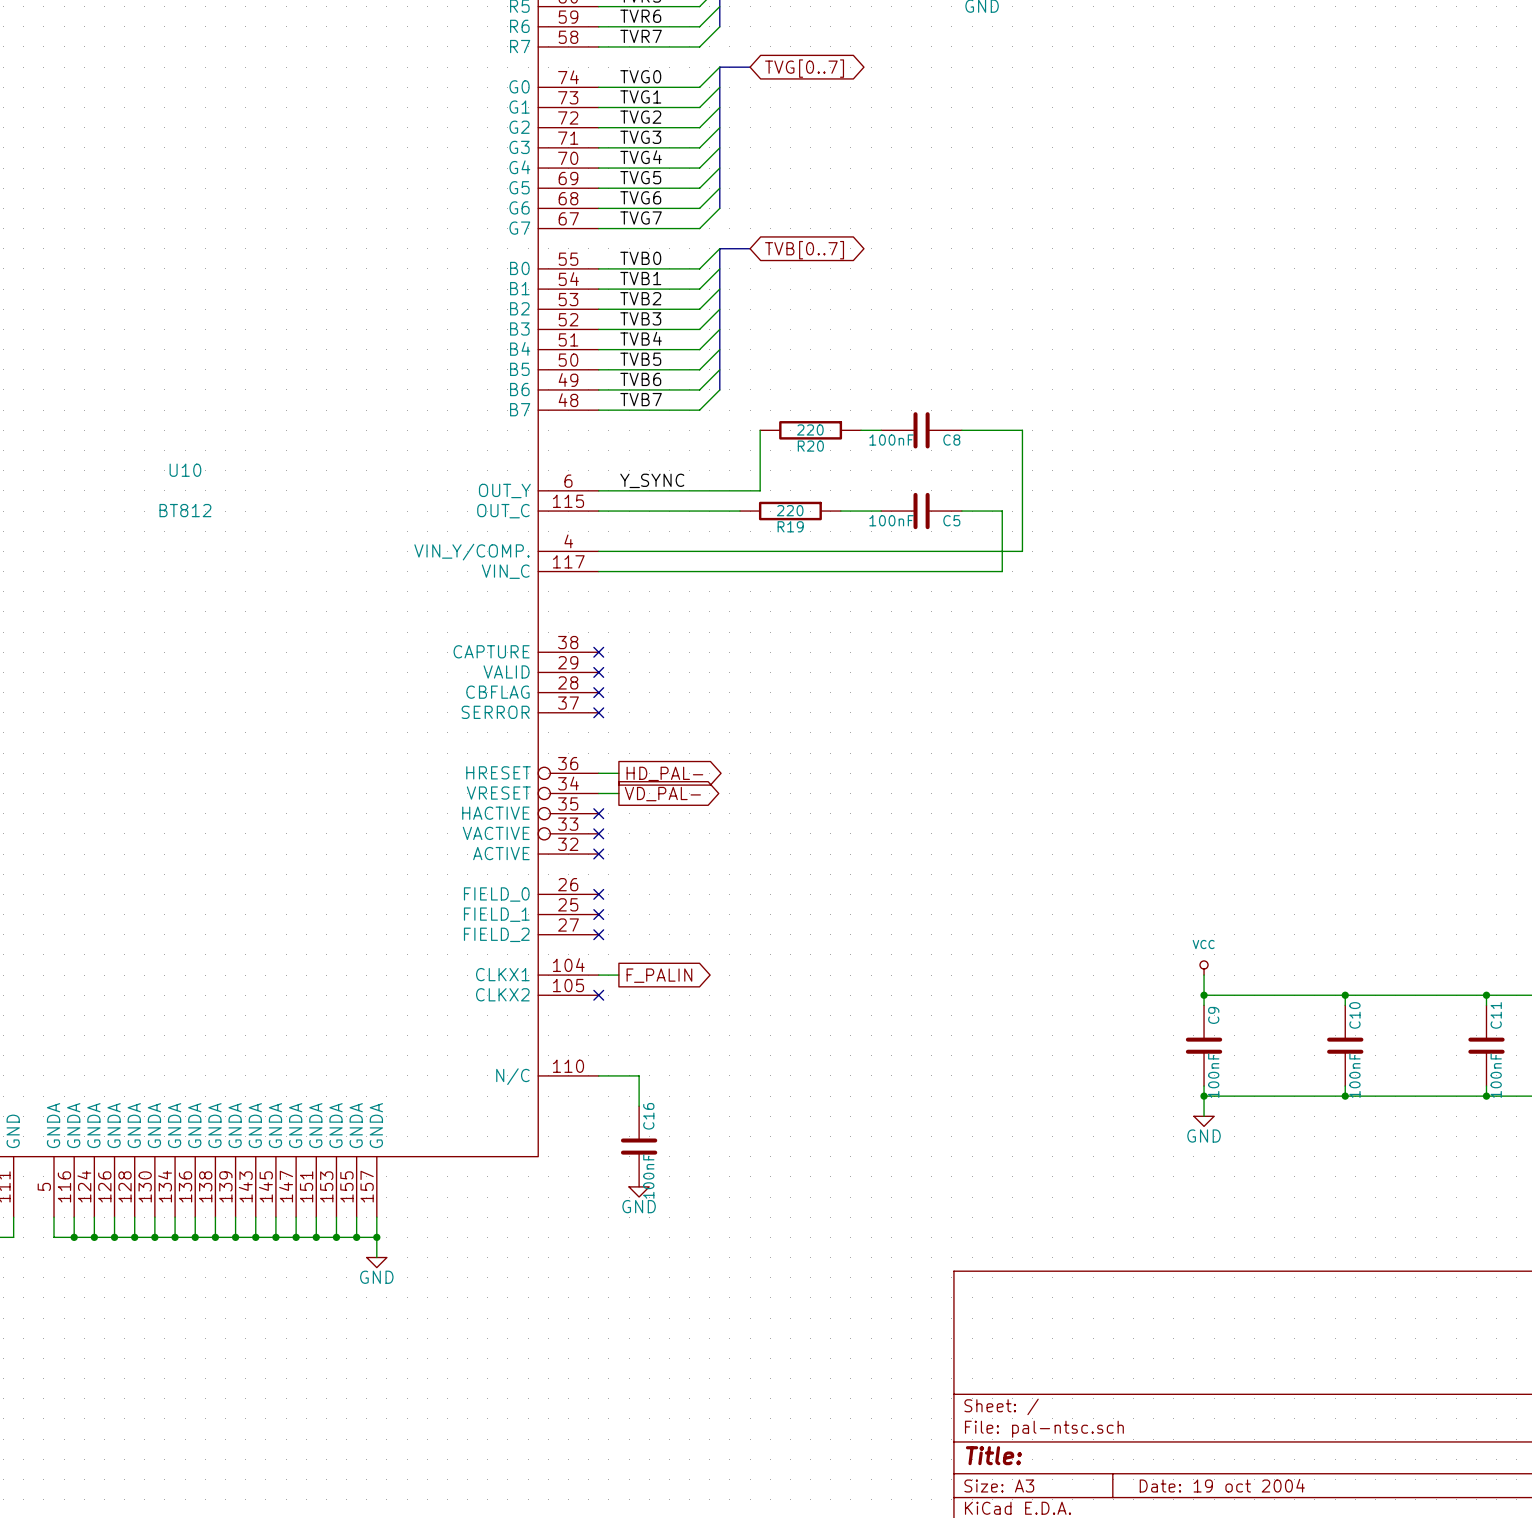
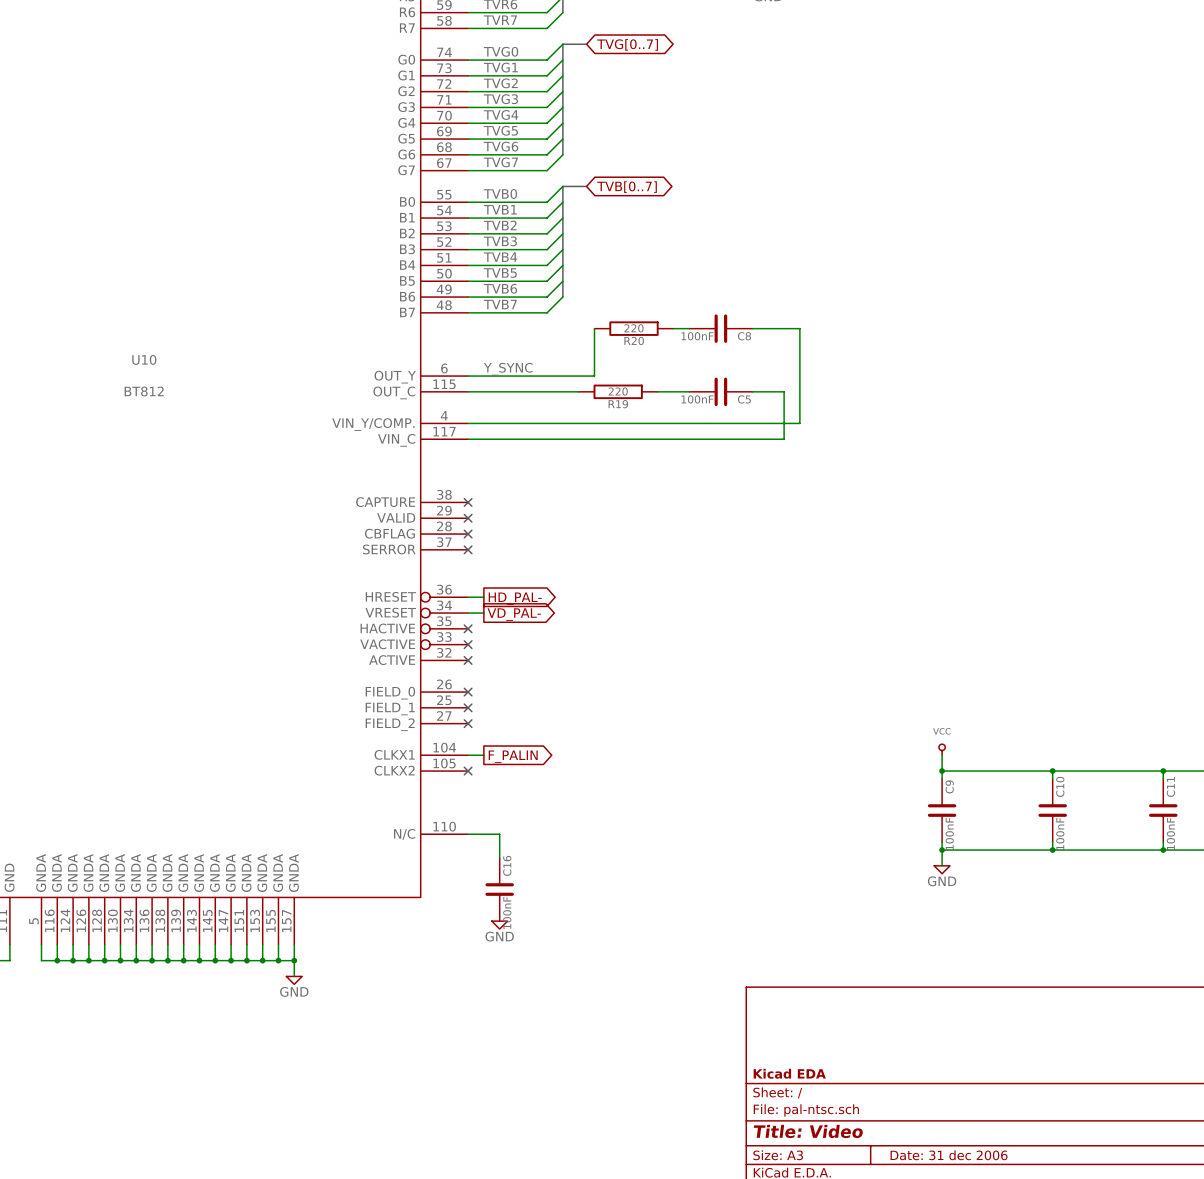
title block: none -> Kicad EDA (789, 1073)
title block: Title: (993, 1455) -> Title: Video (808, 1131)
title block: Date: 19 oct 2004 (1222, 1485) -> Date: 31 dec 2006 (949, 1155)

